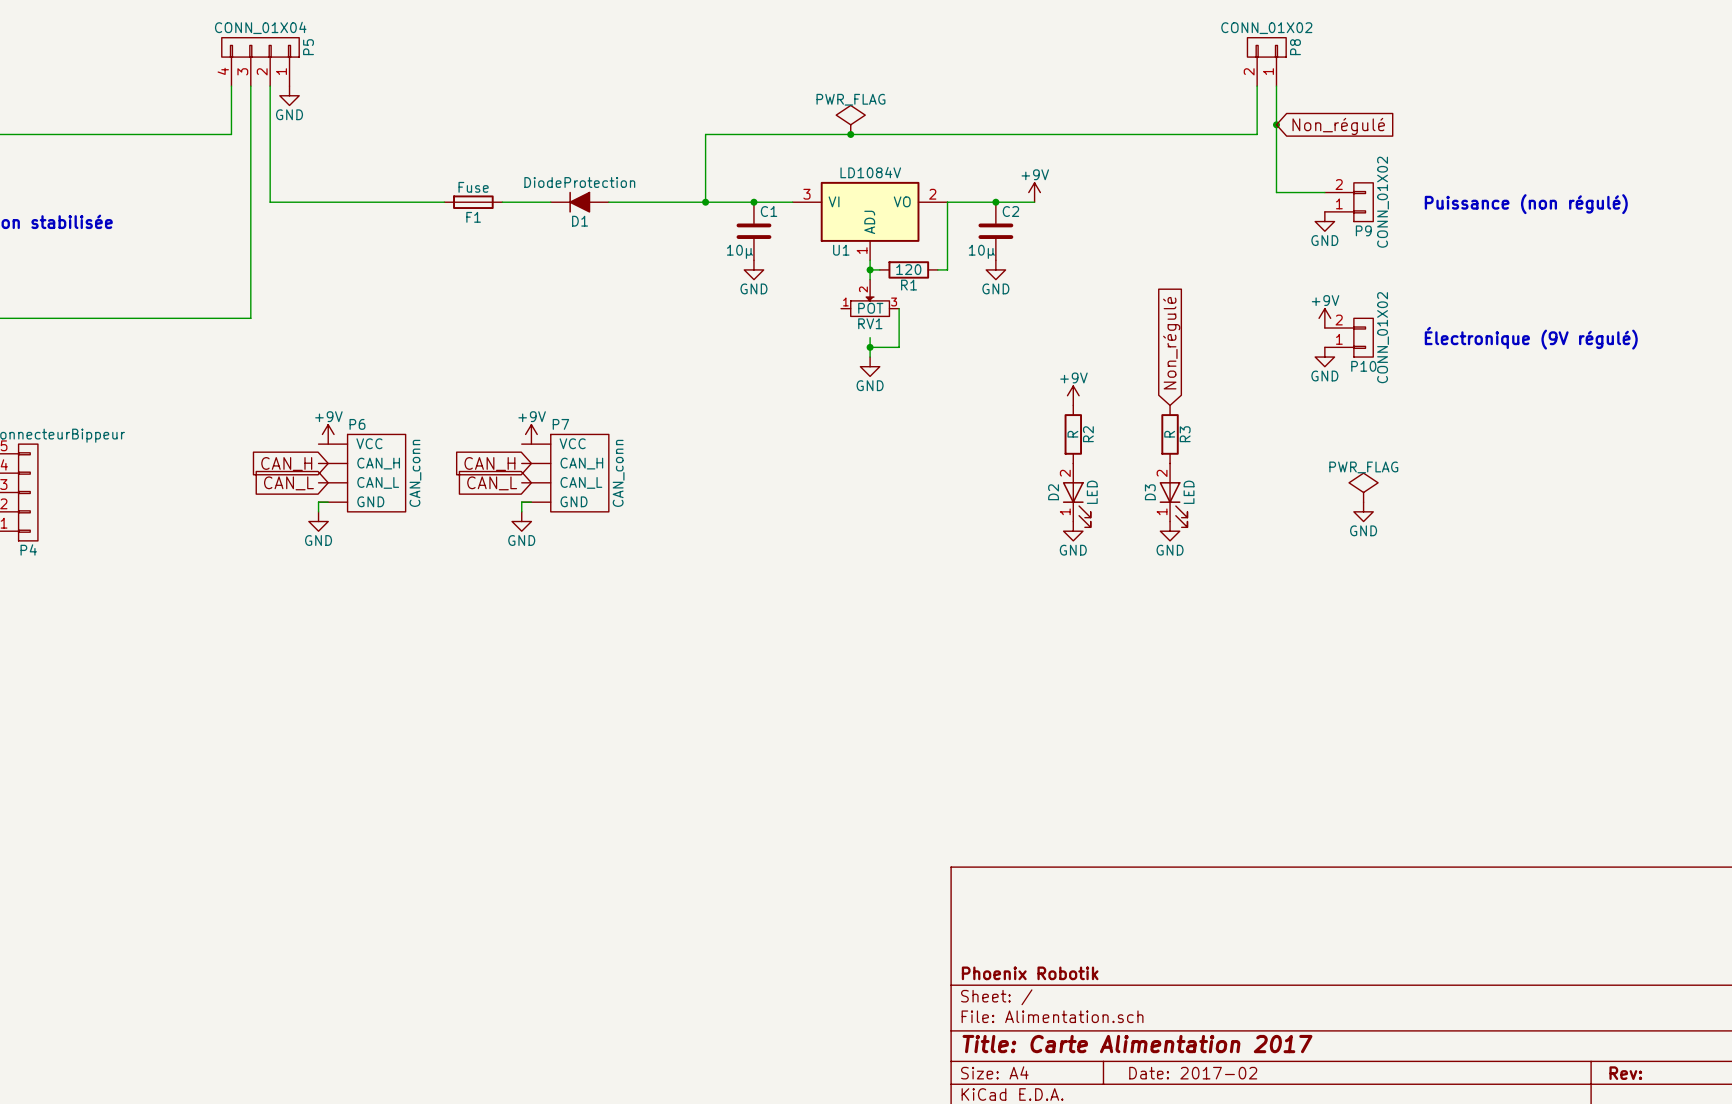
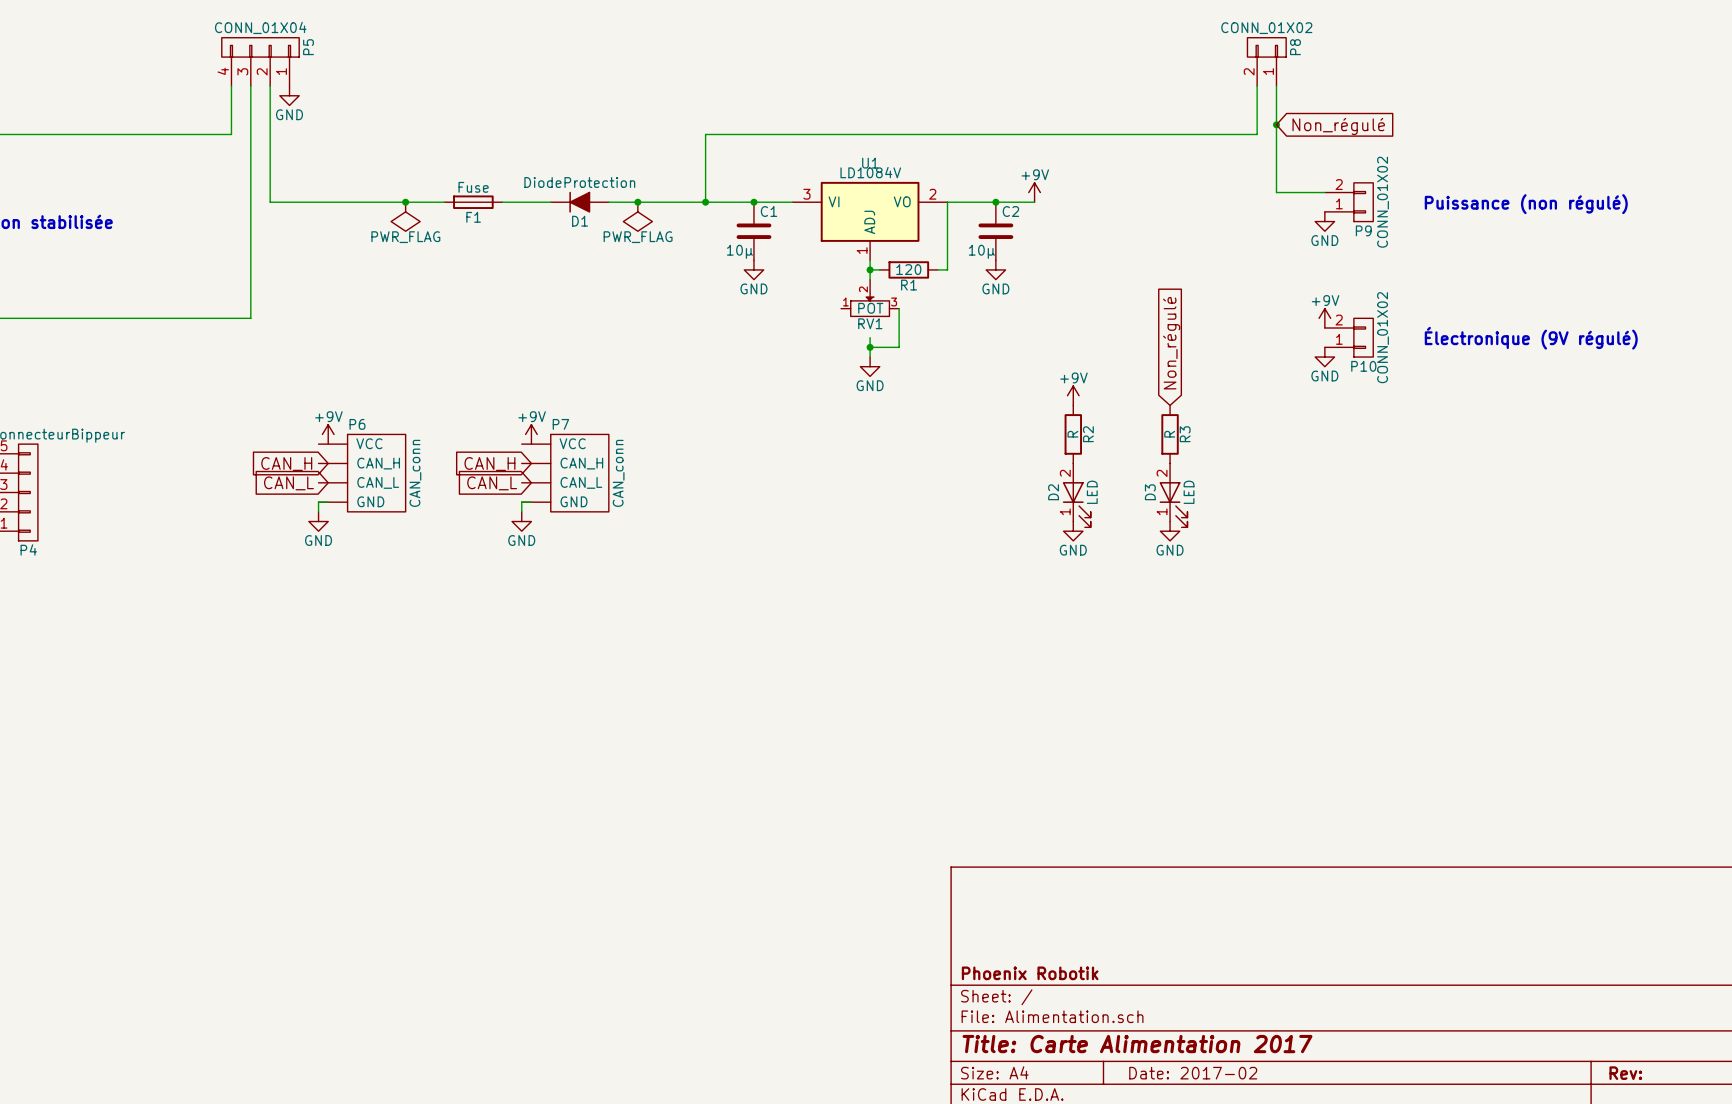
power symbol: PWR_FLAG (850, 119) -> none
junction: (850, 134) -> none
junction: none -> (405, 202)
junction: none -> (637, 202)
power symbol: none -> PWR_FLAG (405, 216)
power symbol: none -> PWR_FLAG (637, 216)
U1 name position: U1 (841, 250) -> U1 (870, 163)
power symbol: PWR_FLAG (1363, 487) -> none
power symbol: GND (1363, 511) -> none

